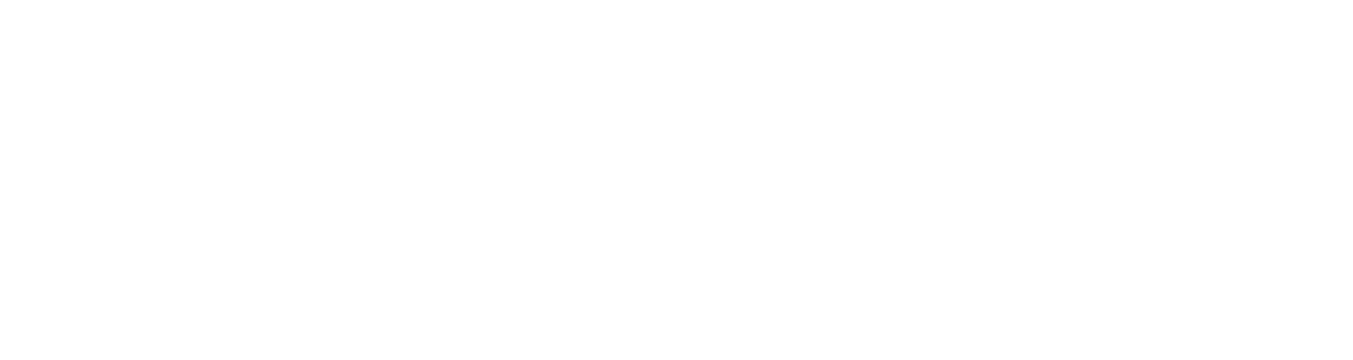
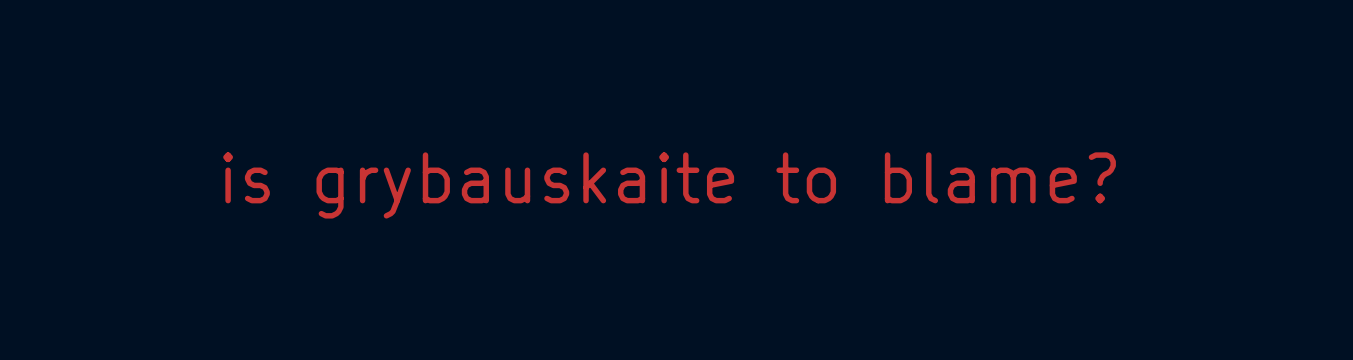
text: none -> is grybauskaite to blame? (669, 185)

